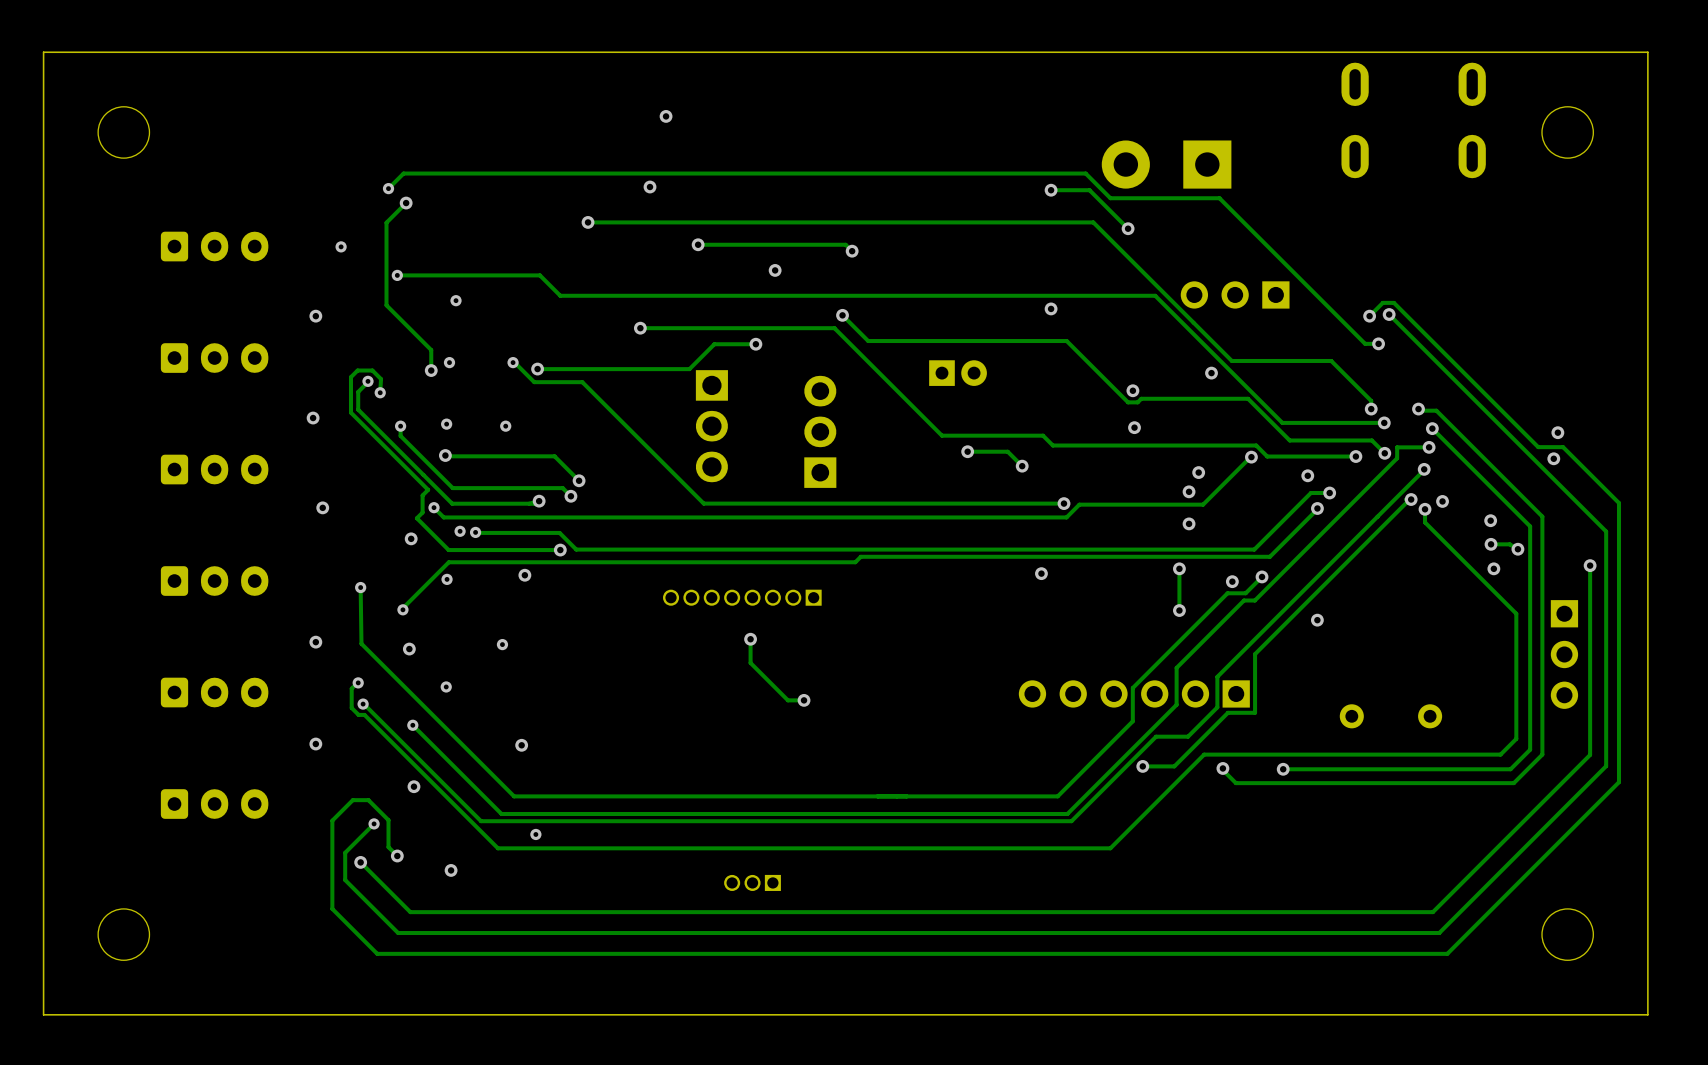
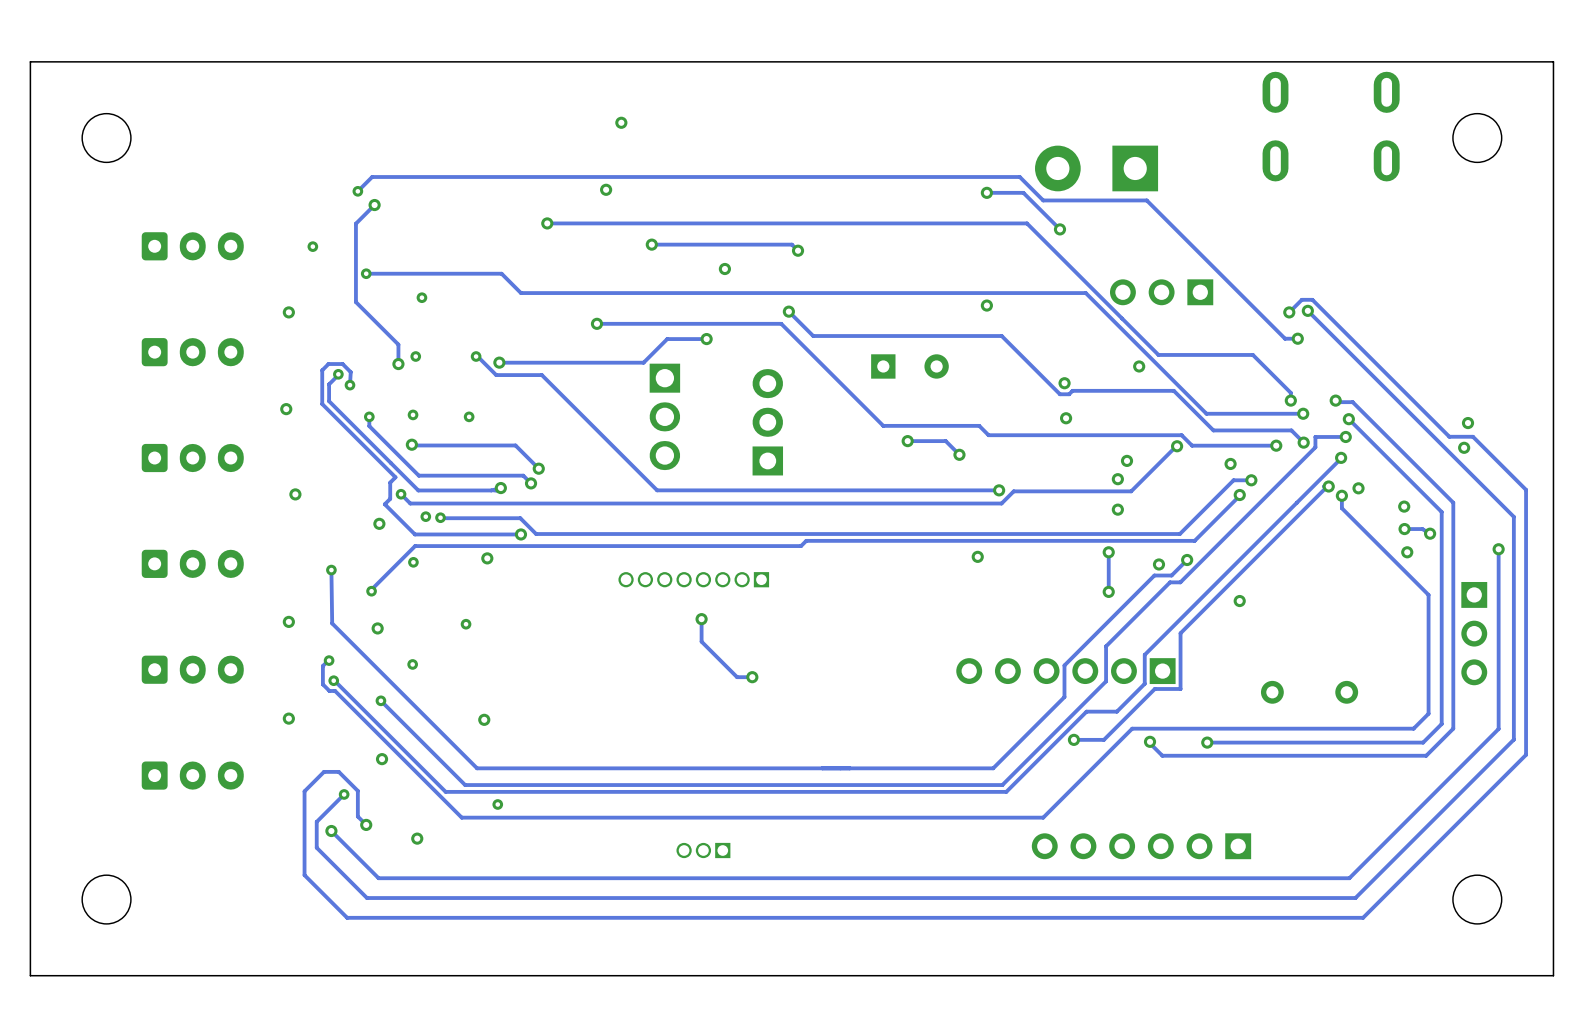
part footprint: [929, 360, 987, 386] -> [871, 354, 949, 379]
part: none -> (1141, 846)

